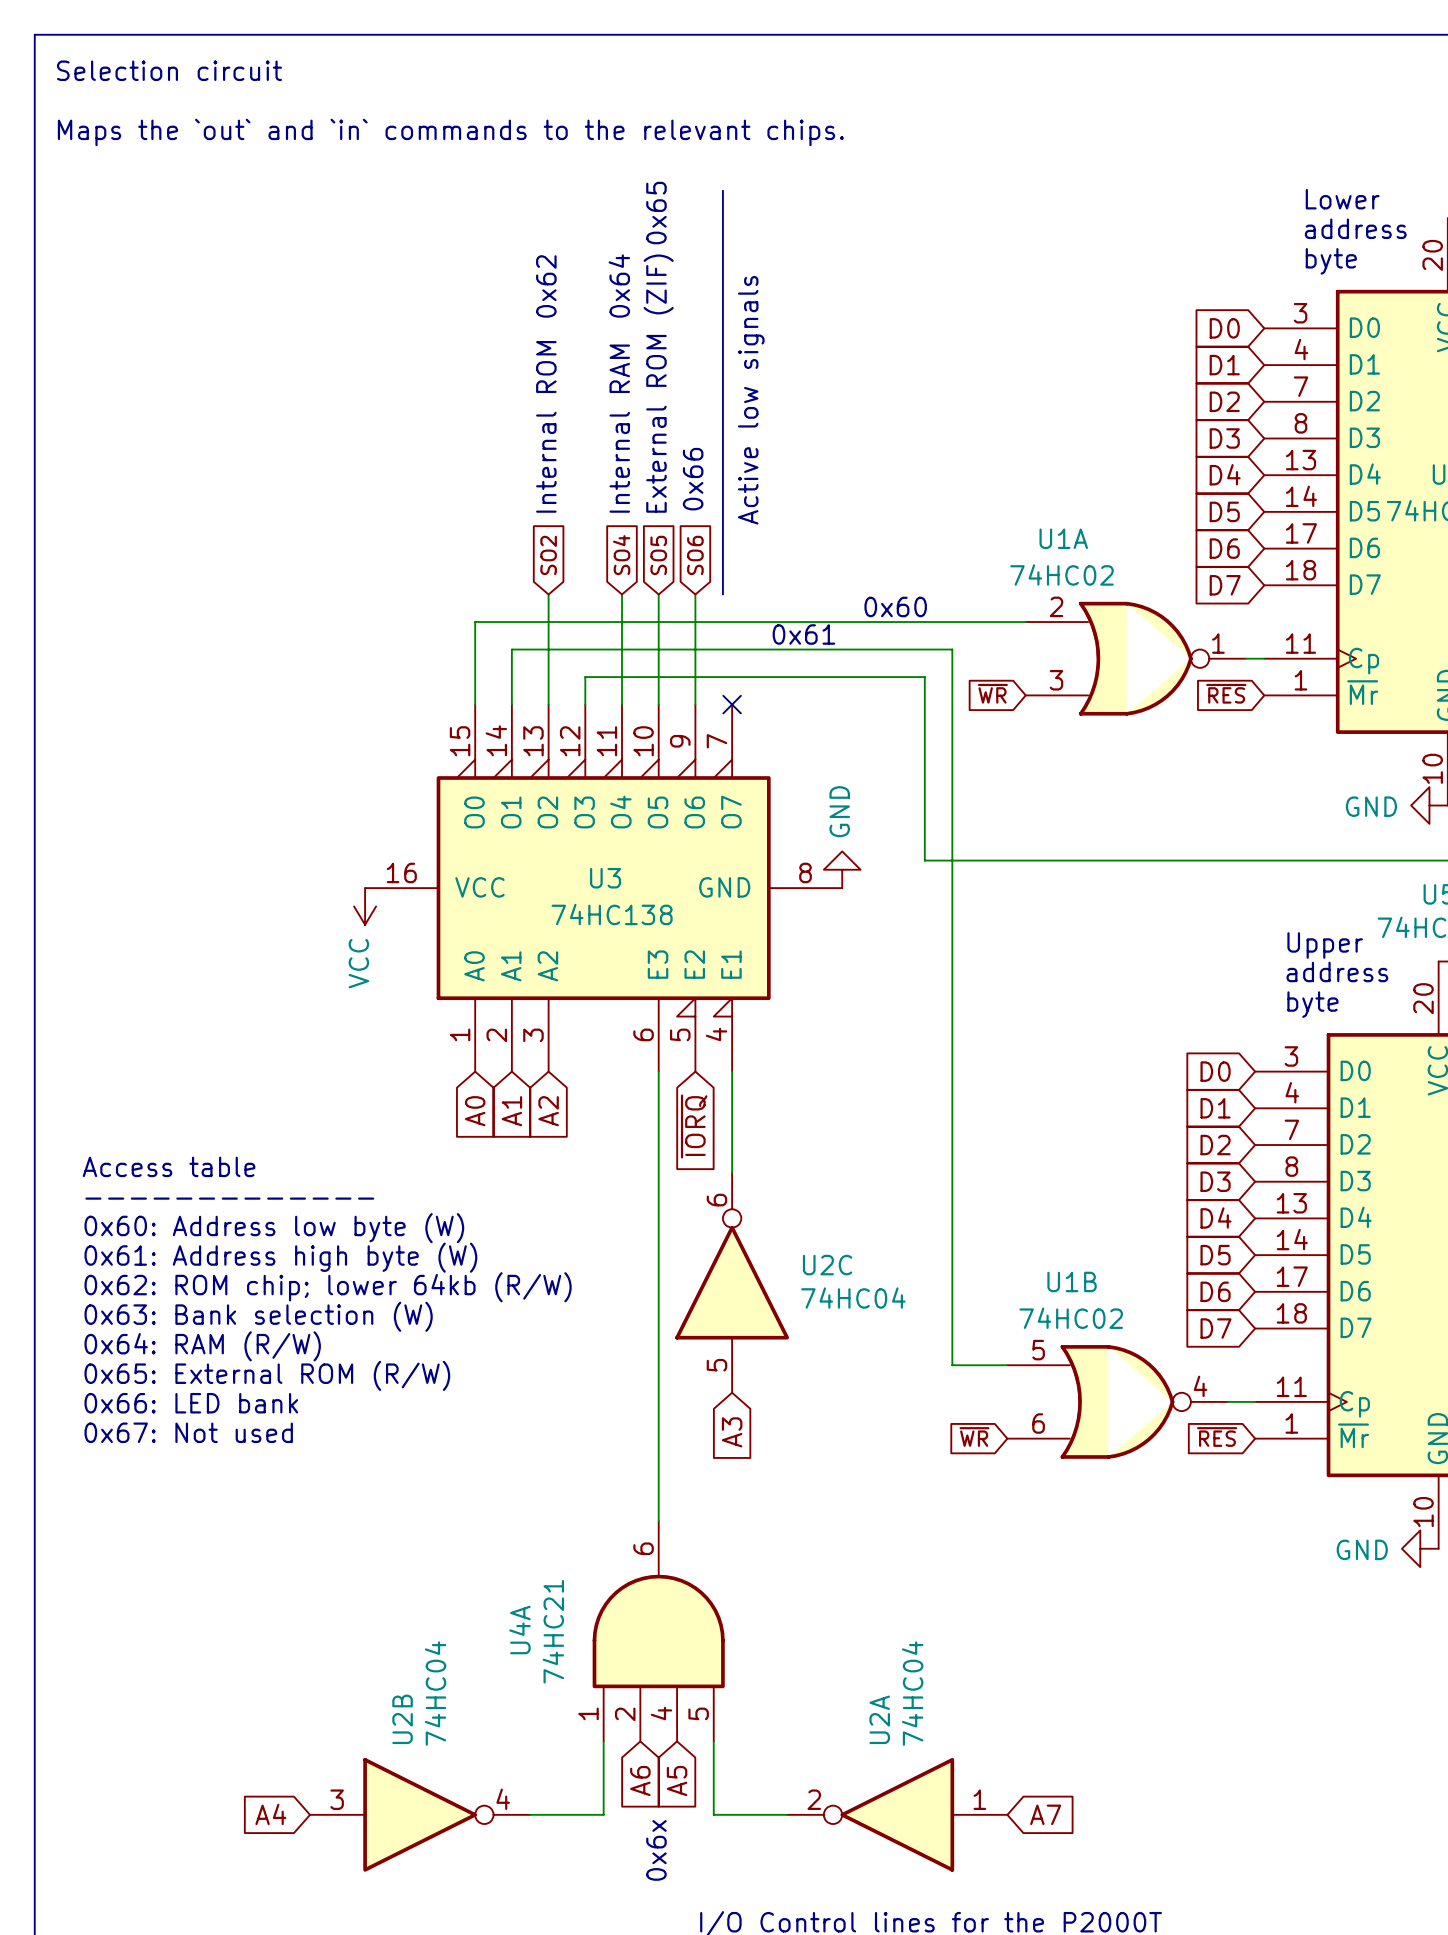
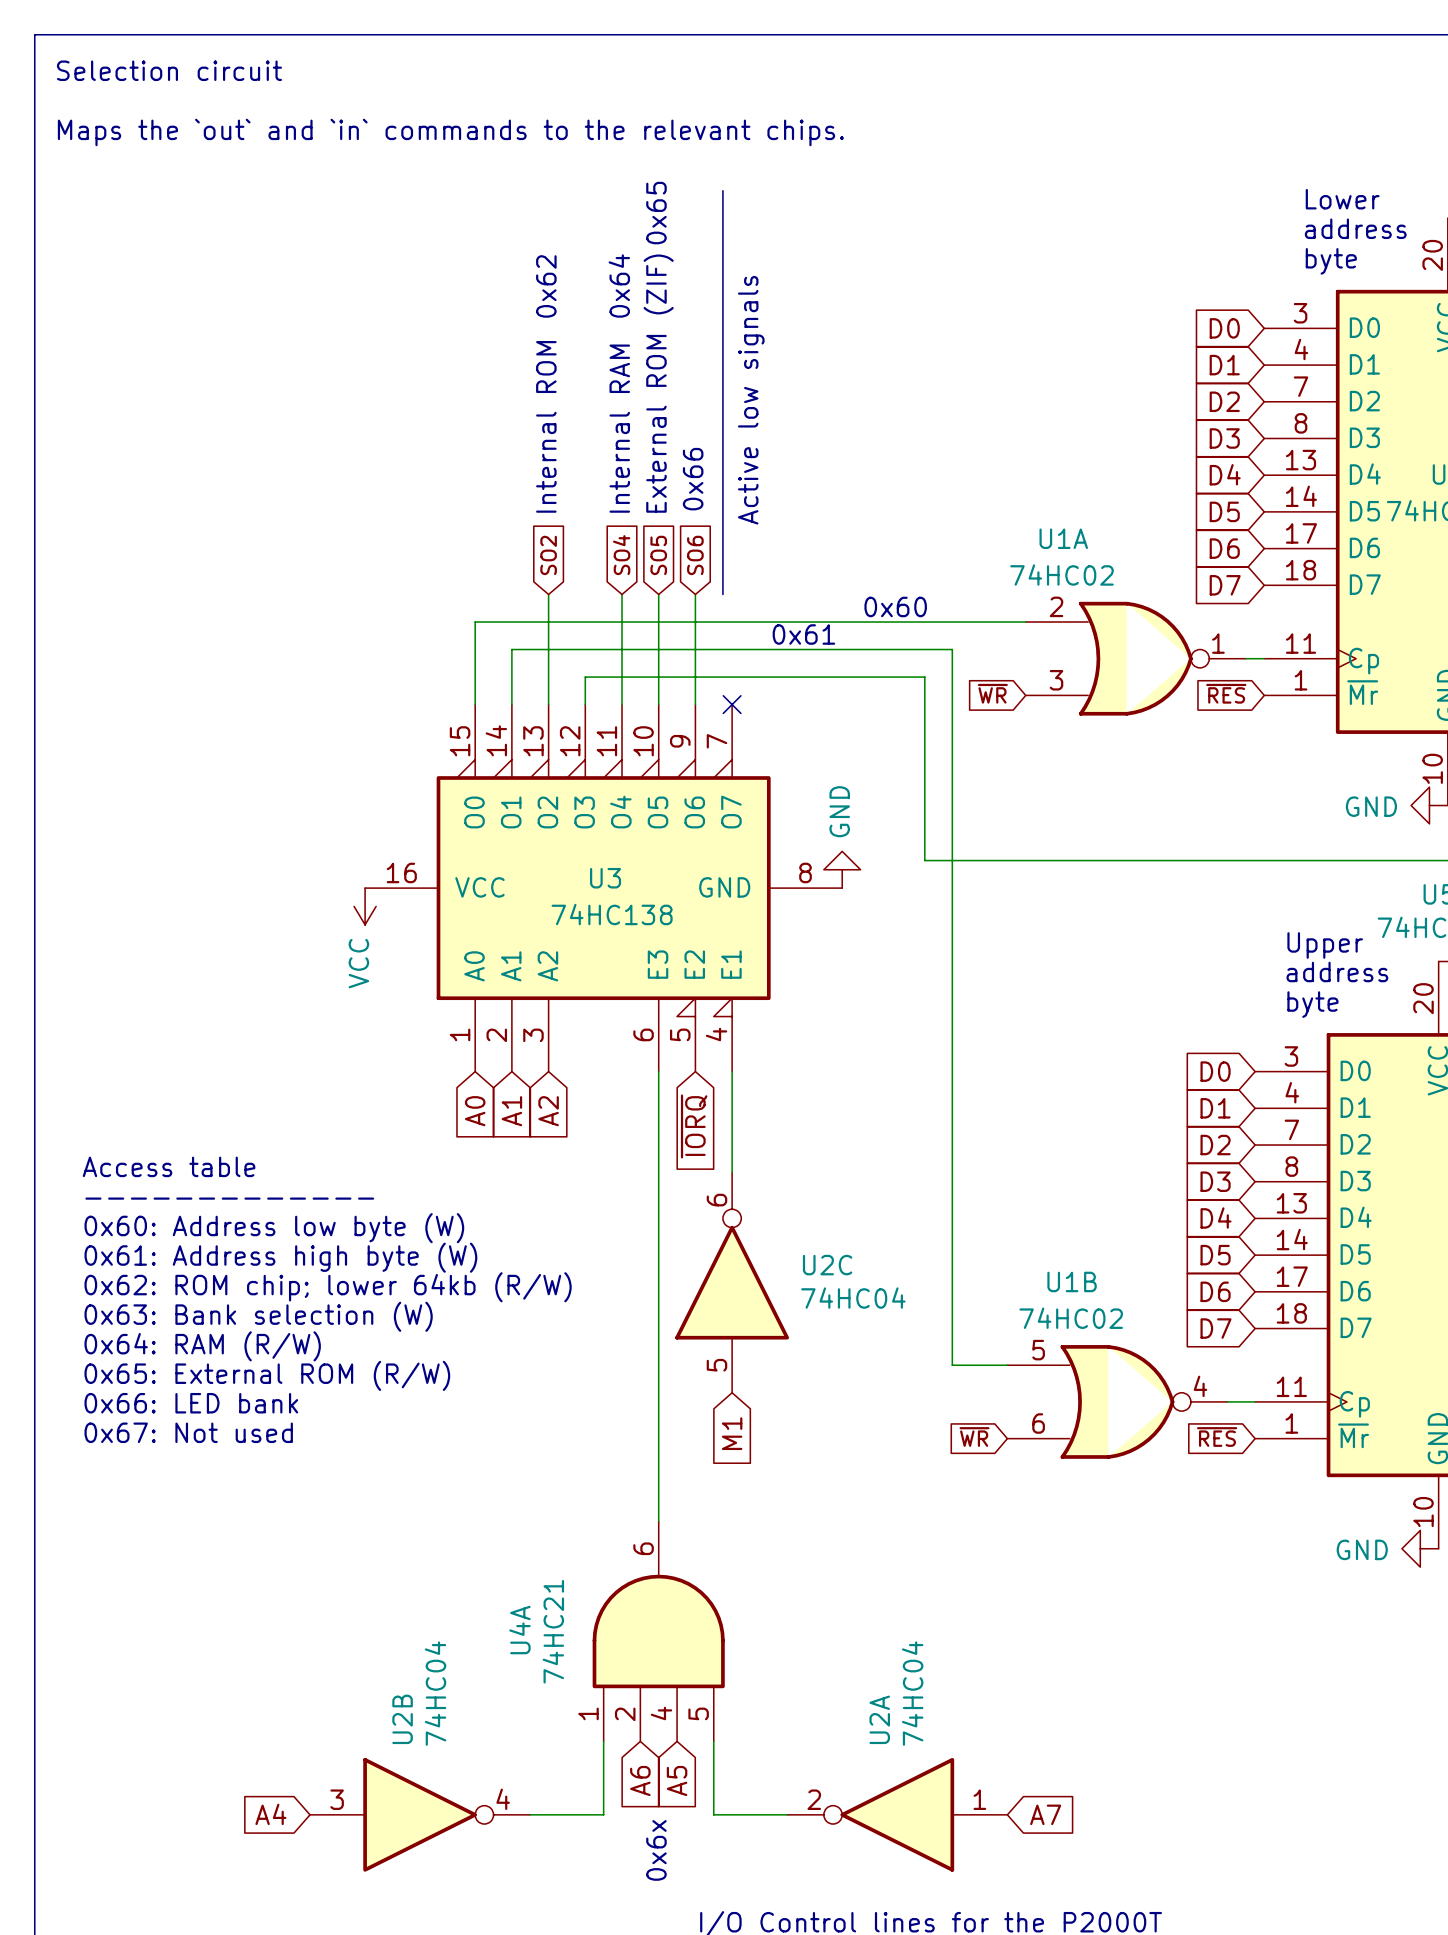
global label: A3 (732, 1432) -> M1 (732, 1433)

